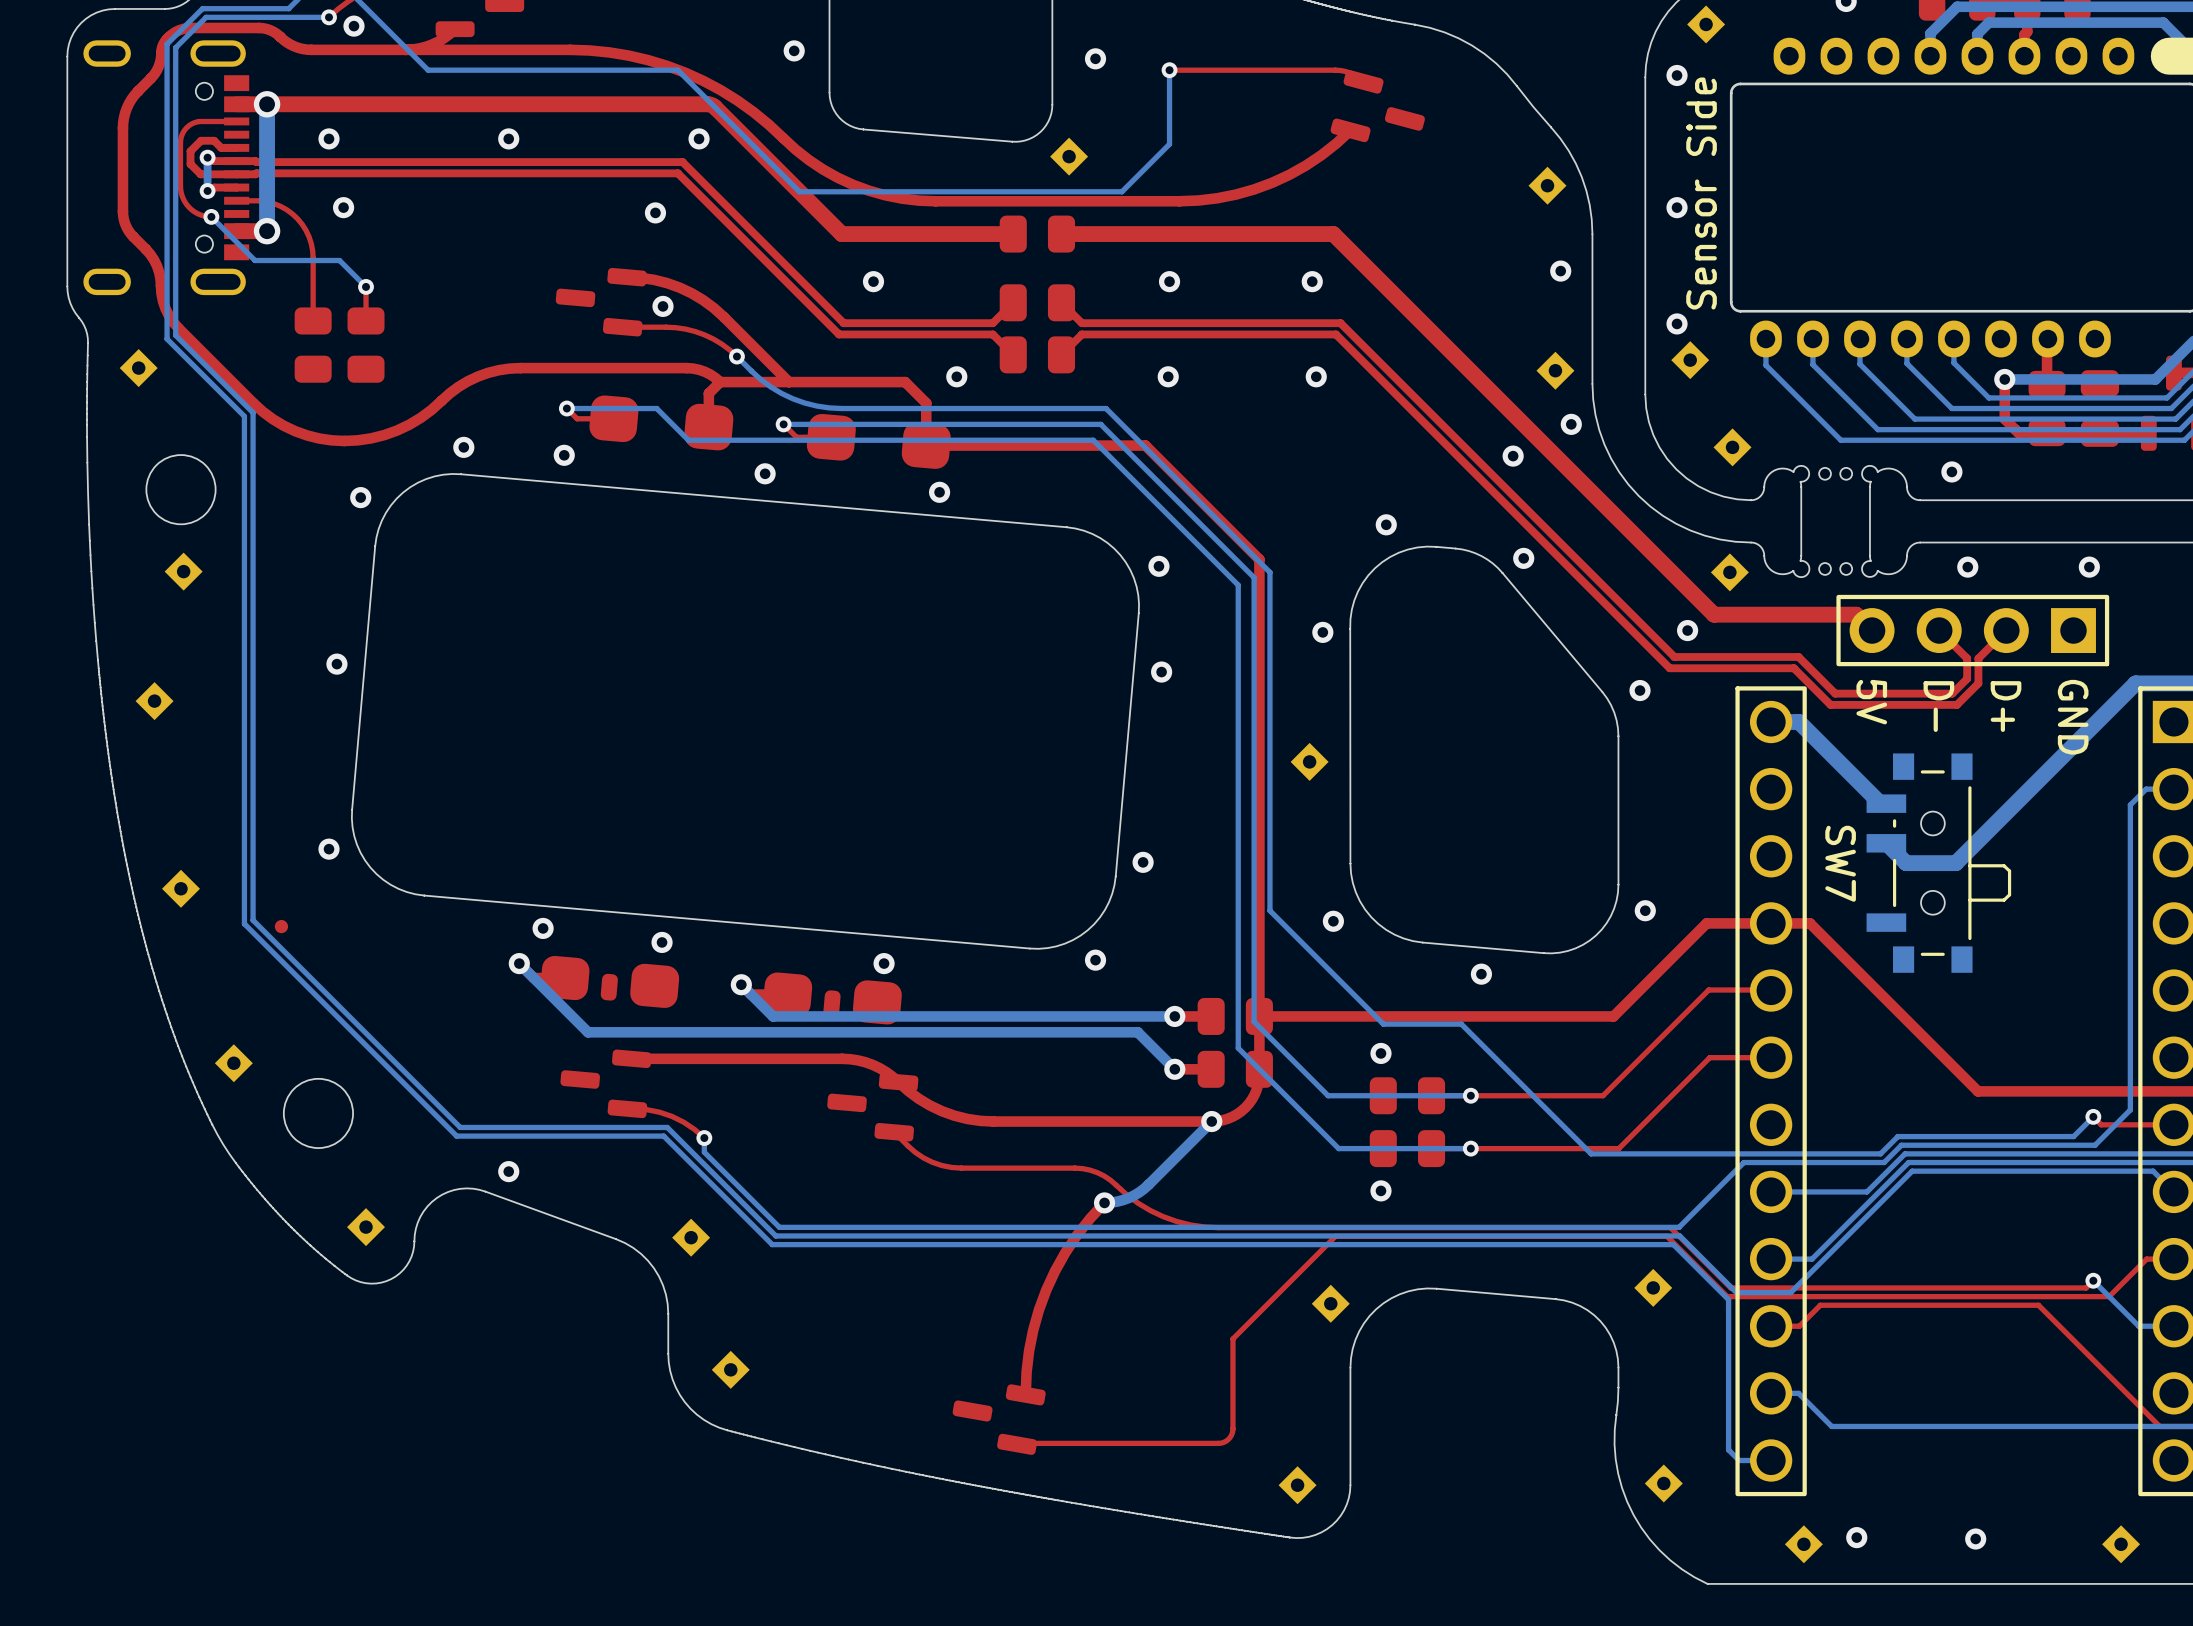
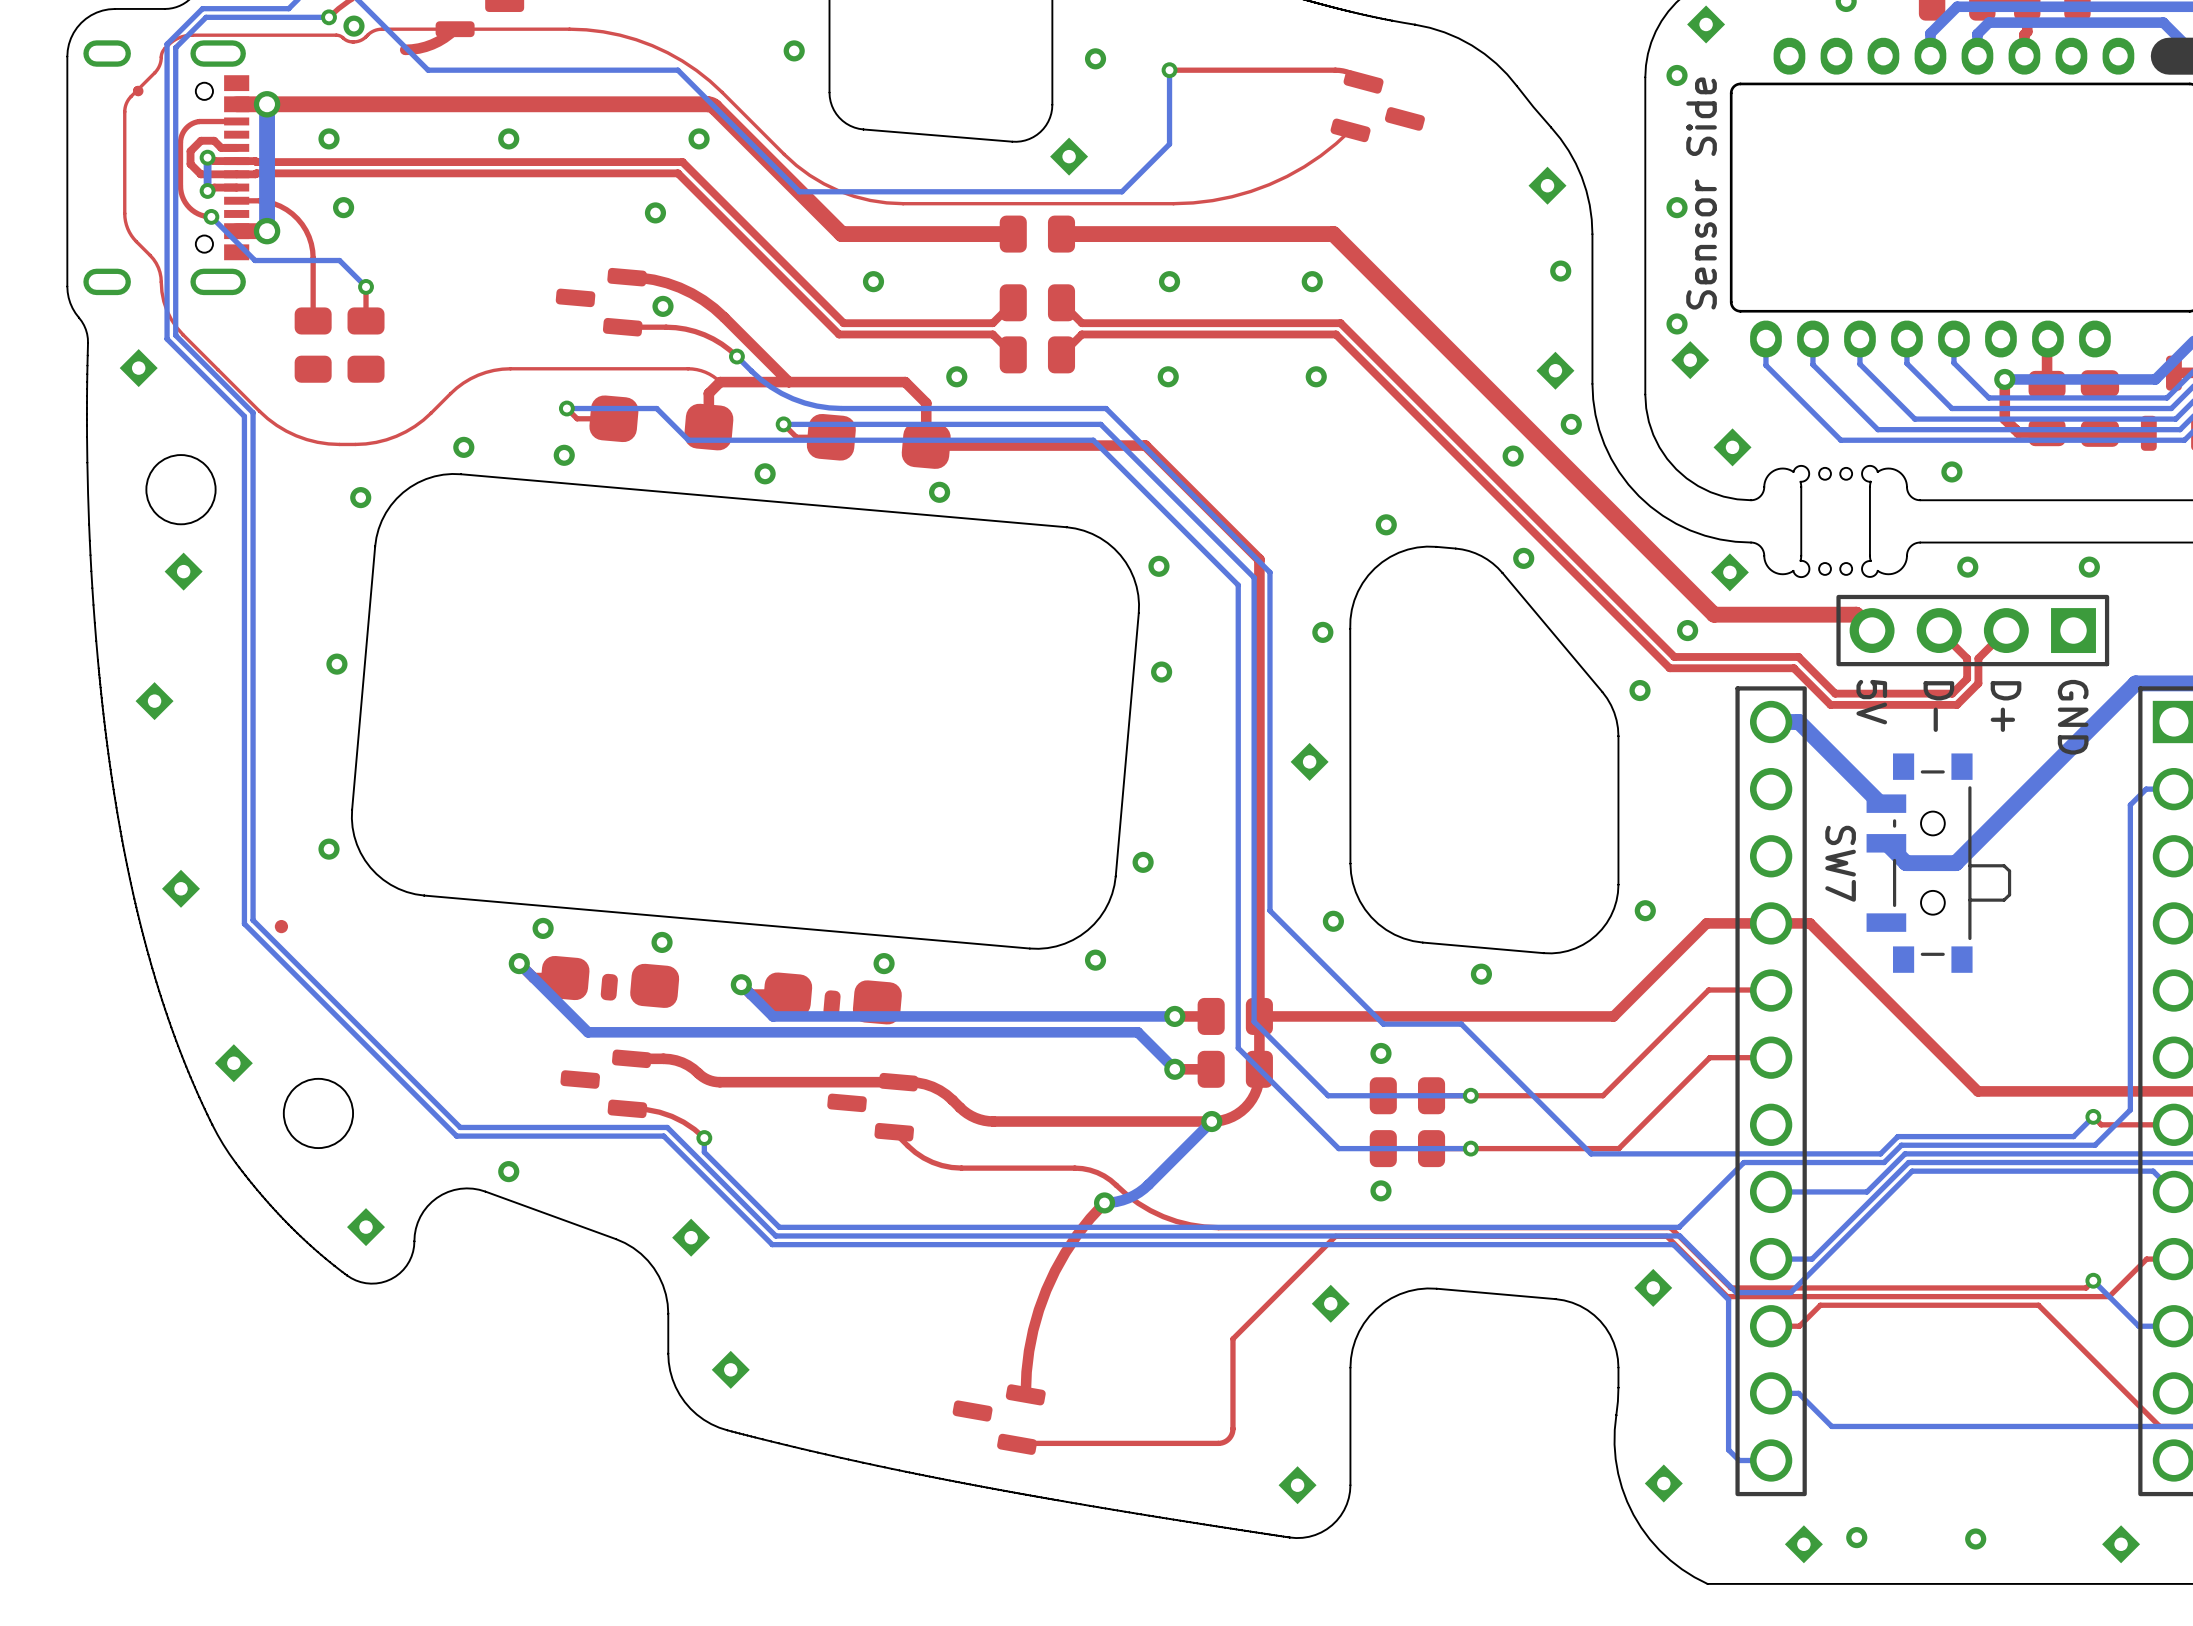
top track: (280, 36) (290, 44) (307, 49) (570, 49) (609, 52) (648, 60) (685, 72) (720, 90) (753, 112) (808, 160) (837, 177) (869, 190) (918, 200) (1179, 201) (1217, 198) (1254, 189) (1289, 174) (1321, 155) (1350, 130) -> (720, 382) (705, 372) (692, 369) (502, 369) (478, 375) (463, 383) (414, 426) (386, 439) (365, 443) (339, 444) (317, 442) (296, 435) (276, 425) (259, 411) (183, 334) (171, 319) (163, 301) (158, 267) (153, 259) (131, 235) (125, 221) (124, 111) (126, 103) (157, 69) (163, 49) (173, 40) (185, 35) (336, 35) (353, 41) (360, 40) (372, 31) (380, 29) (569, 29) (619, 35) (667, 52) (709, 80) (784, 154) (809, 175) (838, 190) (854, 196) (886, 202) (1173, 203) (1212, 200) (1250, 191) (1287, 176) (1320, 155) (1350, 130)
top track: (280, 36) (270, 30) (258, 27) (190, 27) (175, 32) (162, 45) (159, 63) (155, 73) (129, 103) (123, 117) (122, 127) (123, 218) (129, 231) (150, 254) (157, 265) (163, 301) (169, 315) (178, 328) (262, 411) (283, 425) (307, 435) (331, 440) (357, 440) (384, 435) (409, 424) (431, 409) (458, 386) (477, 376) (498, 370) (520, 368) (686, 368) (704, 371) (720, 382) -> none
top track: (663, 1058) (857, 1060) (872, 1064) (886, 1072) (918, 1098) (942, 1111) (967, 1118) (993, 1121) -> (663, 1058) (682, 1062) (705, 1078) (716, 1082) (917, 1082) (939, 1090) (971, 1115) (993, 1121)

